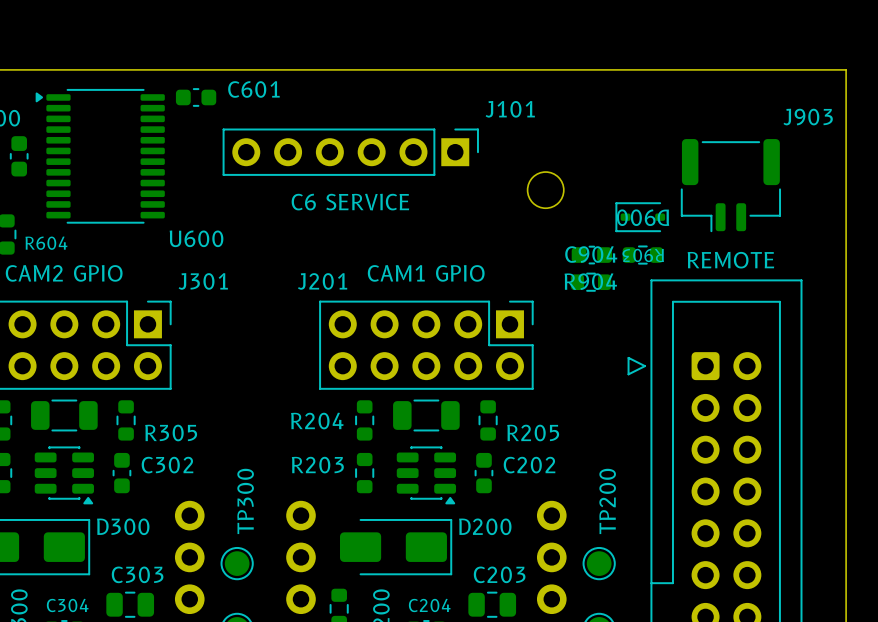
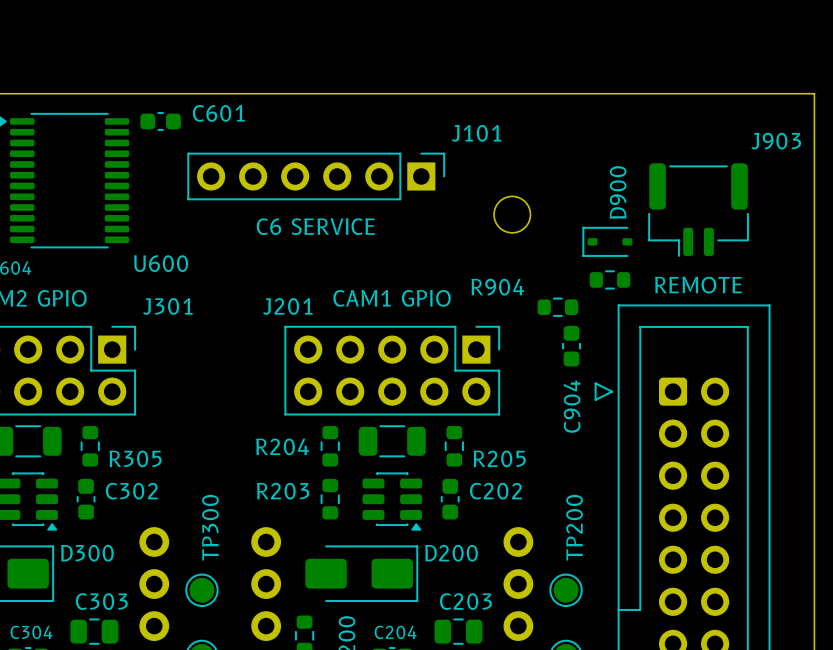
D900 name rotation: 0° (642, 217) -> 90° clockwise (618, 192)
C904 name position: C904 (591, 254) -> C904 (572, 406)
C904 rotation: 0° (591, 255) -> 90° clockwise (571, 346)
C904 position: (591, 255) -> (571, 346)
R903 name: R903 (643, 255) -> none
R904 name position: R904 (590, 281) -> R904 (497, 287)

